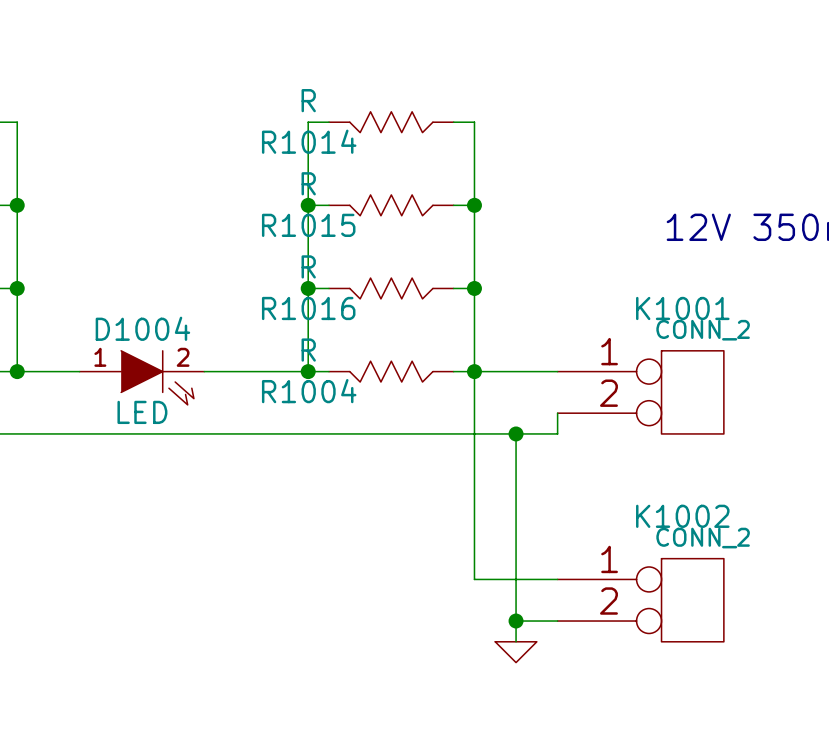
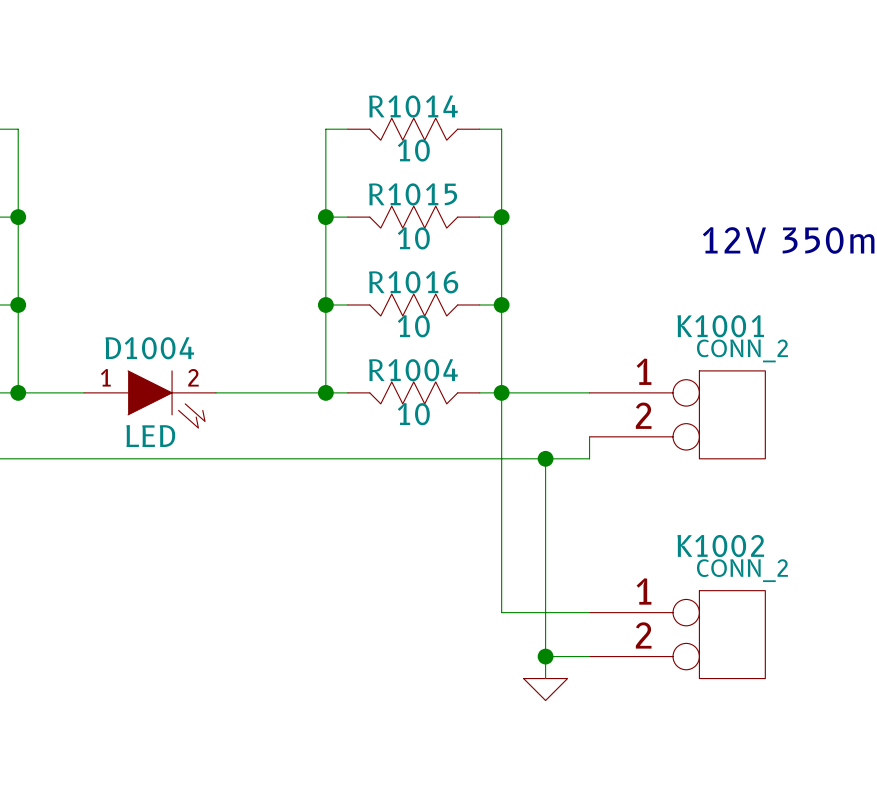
R1014 value: R (308, 100) -> 10 (413, 150)
R1014 name position: R1014 (309, 141) -> R1014 (413, 106)
R1015 value: R (308, 183) -> 10 (413, 238)
R1015 name position: R1015 (308, 225) -> R1015 (413, 194)
R1016 value: R (308, 266) -> 10 (413, 326)
R1016 name position: R1016 (308, 308) -> R1016 (413, 282)
R1004 value: R (308, 350) -> 10 (413, 414)
R1004 name position: R1004 (309, 391) -> R1004 (413, 370)

